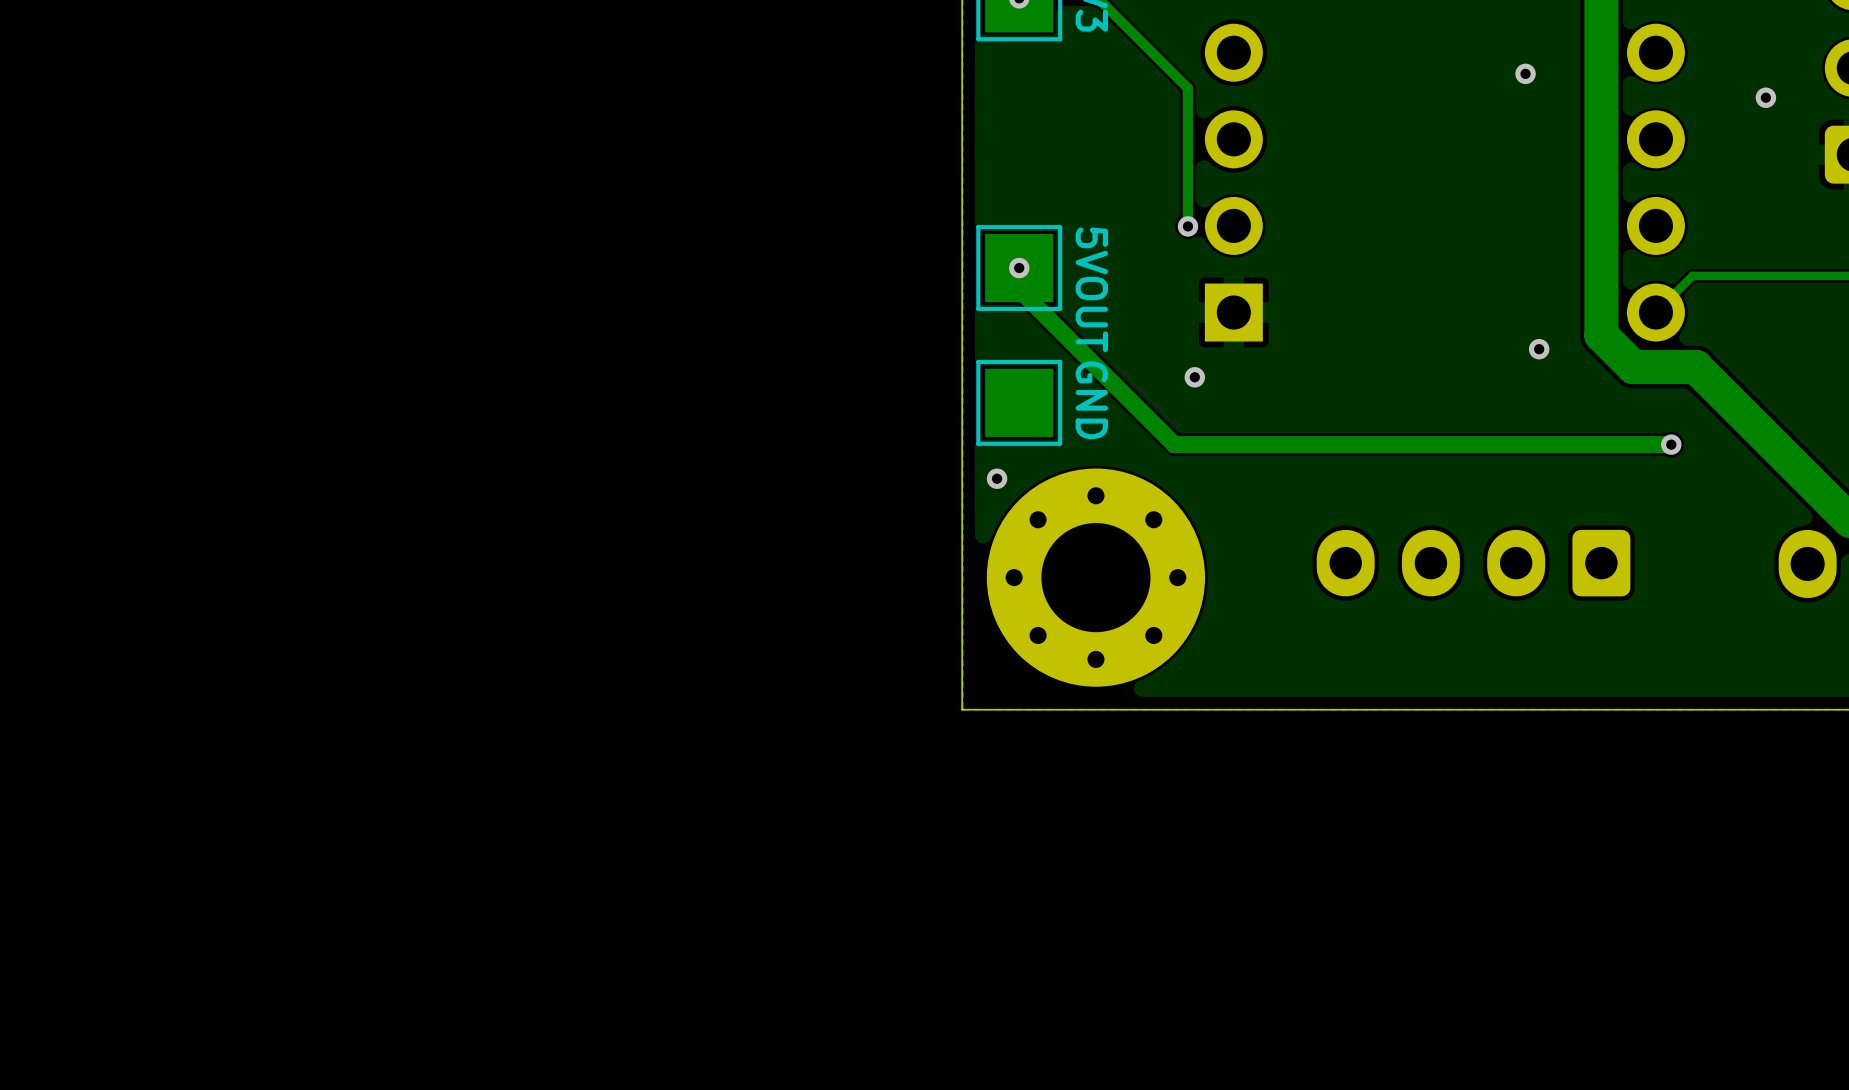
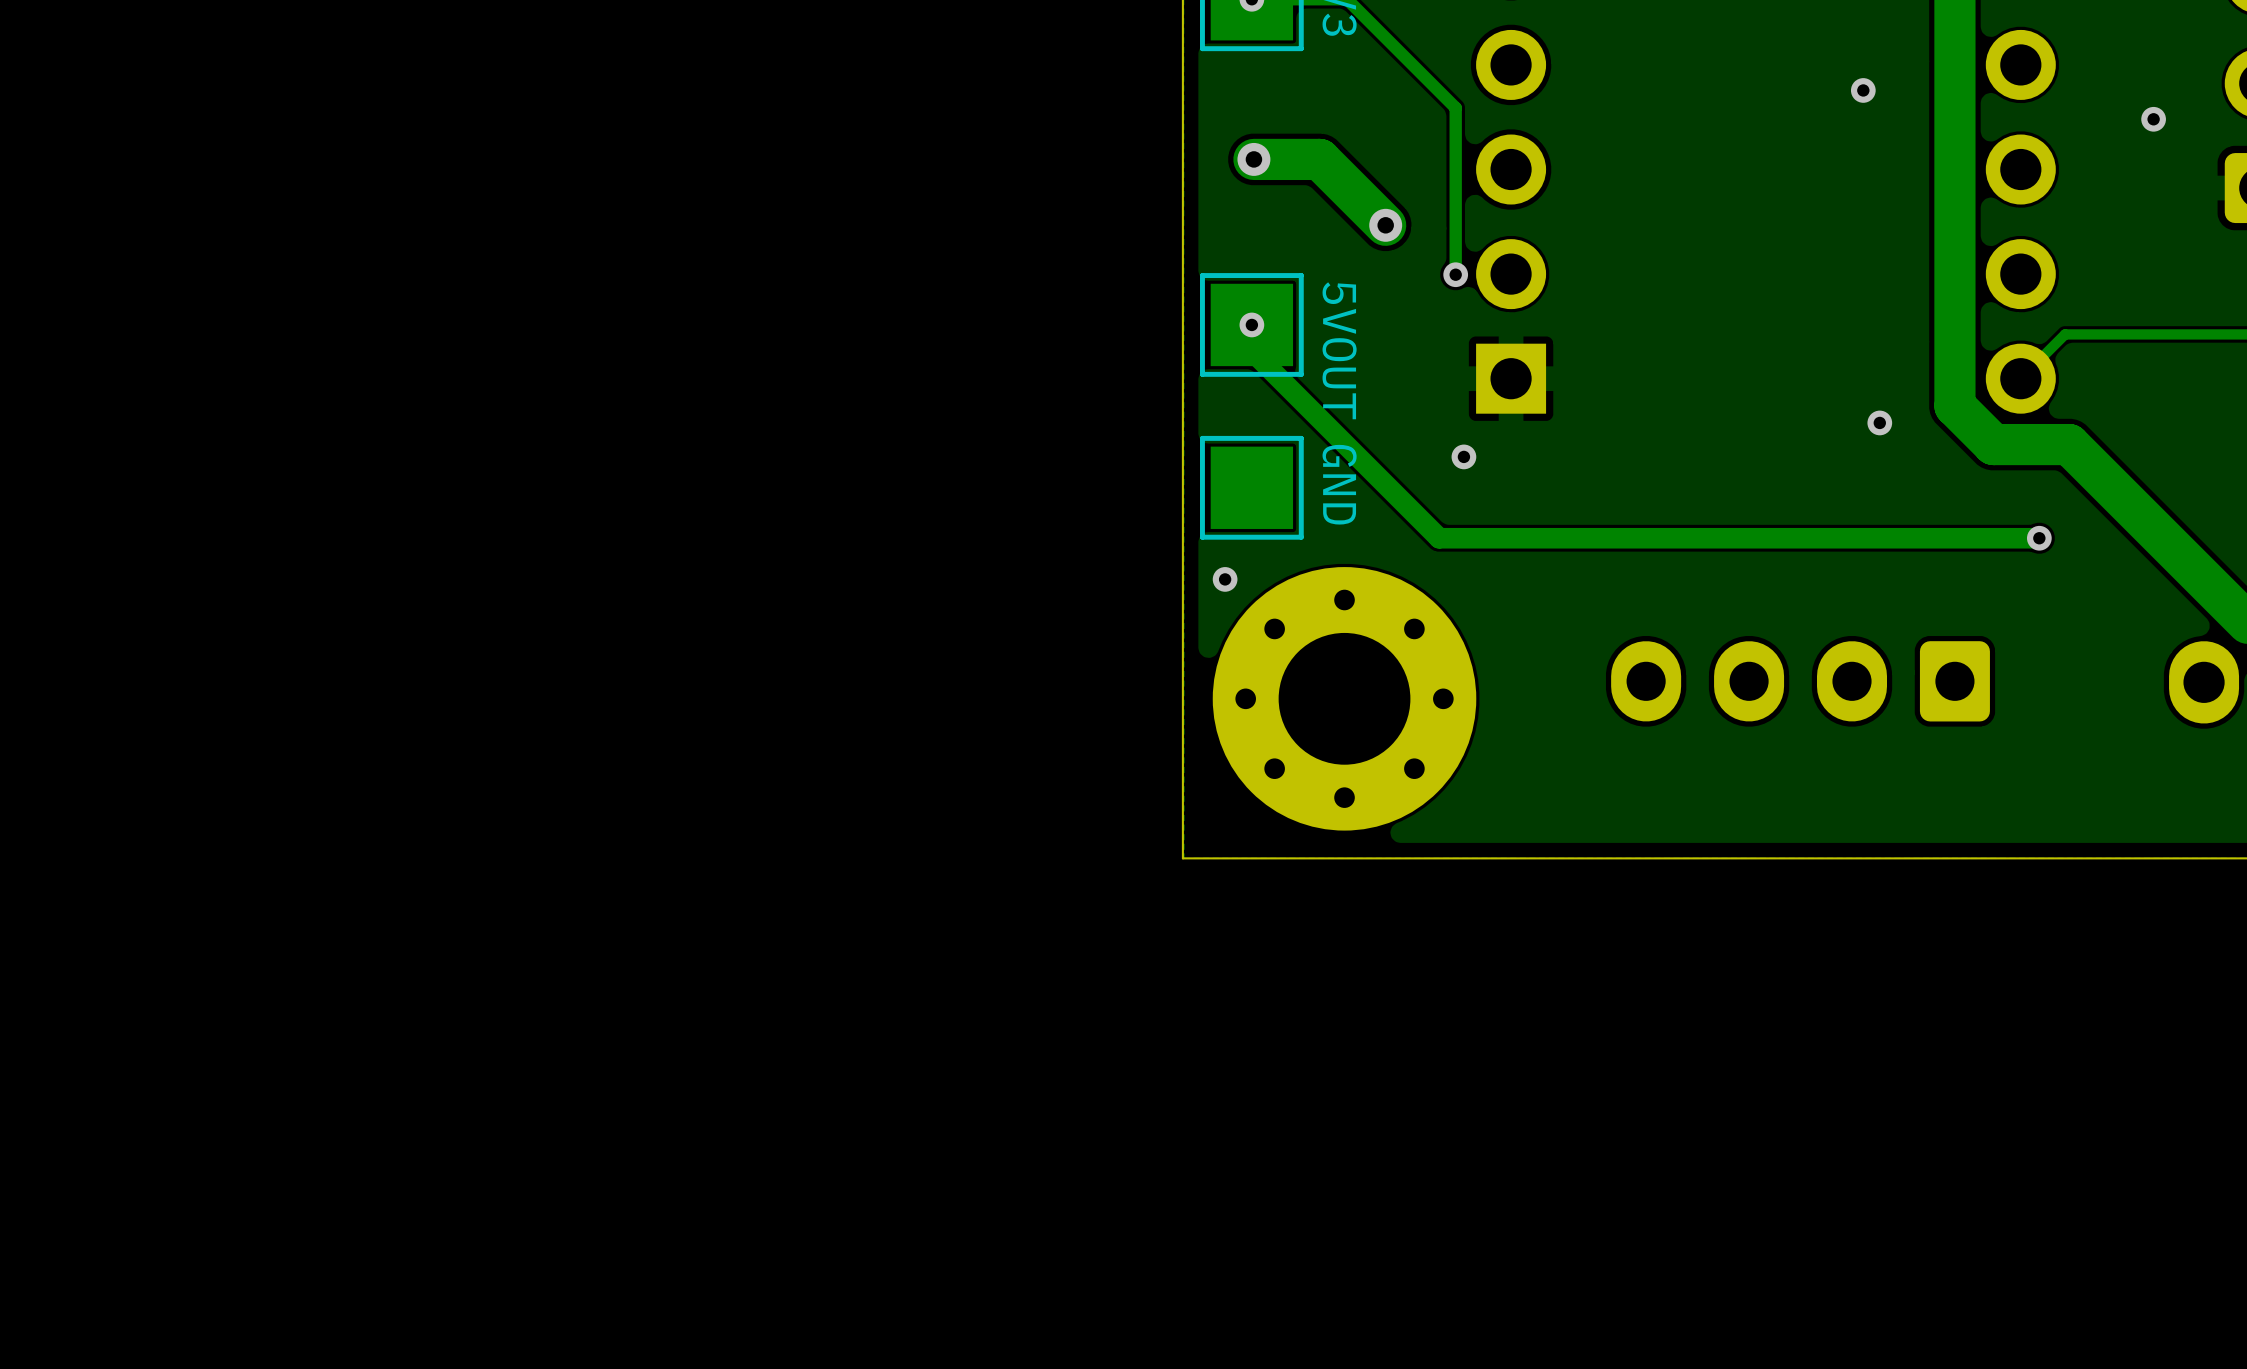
track: none -> (1253, 159) (1319, 159) (1385, 225)
via: none -> (1253, 159)
via: none -> (1385, 225)

